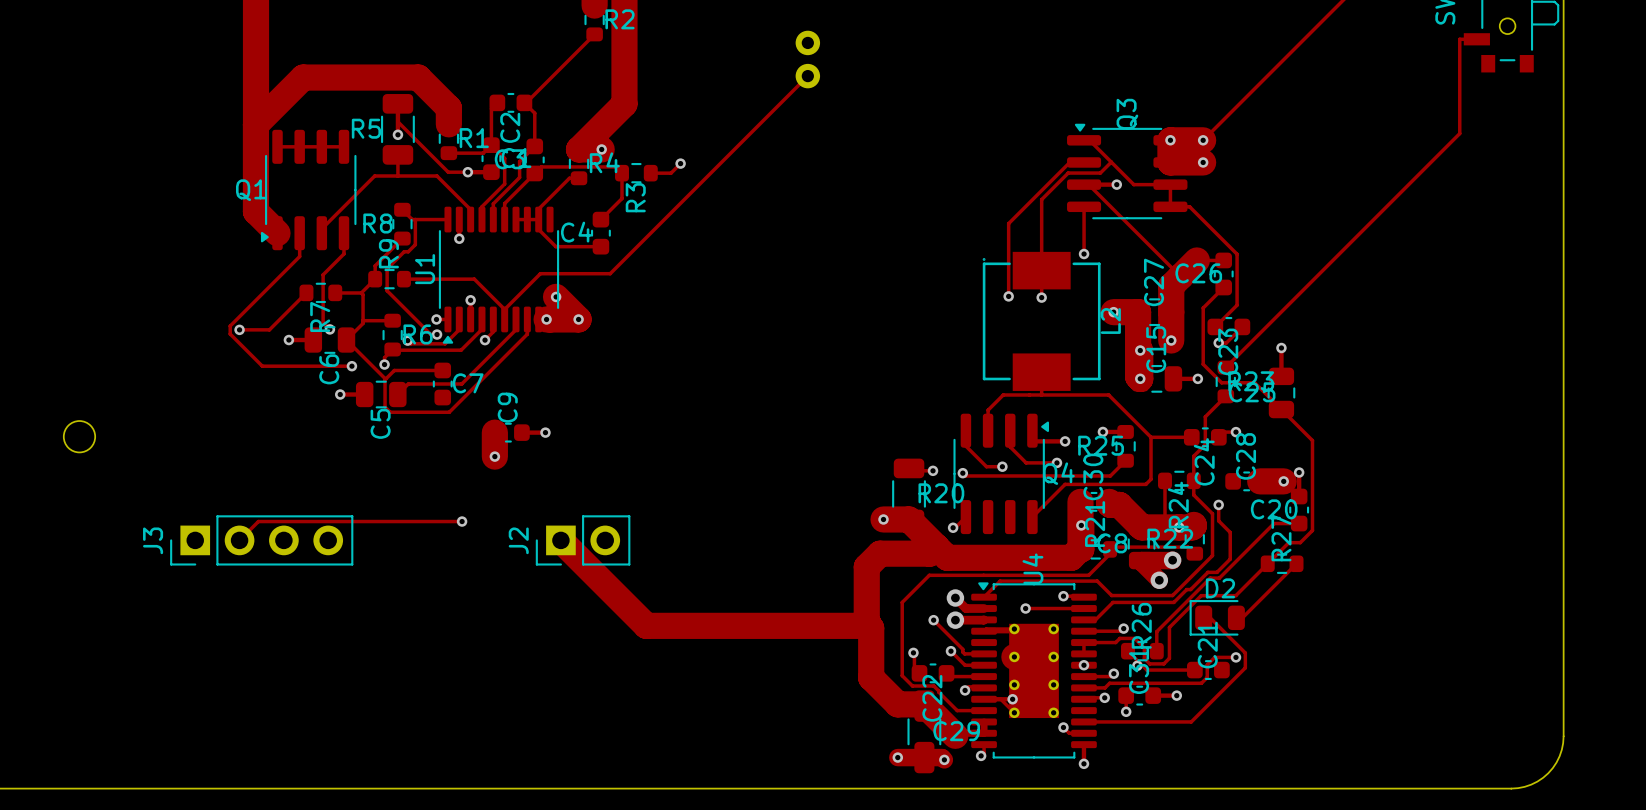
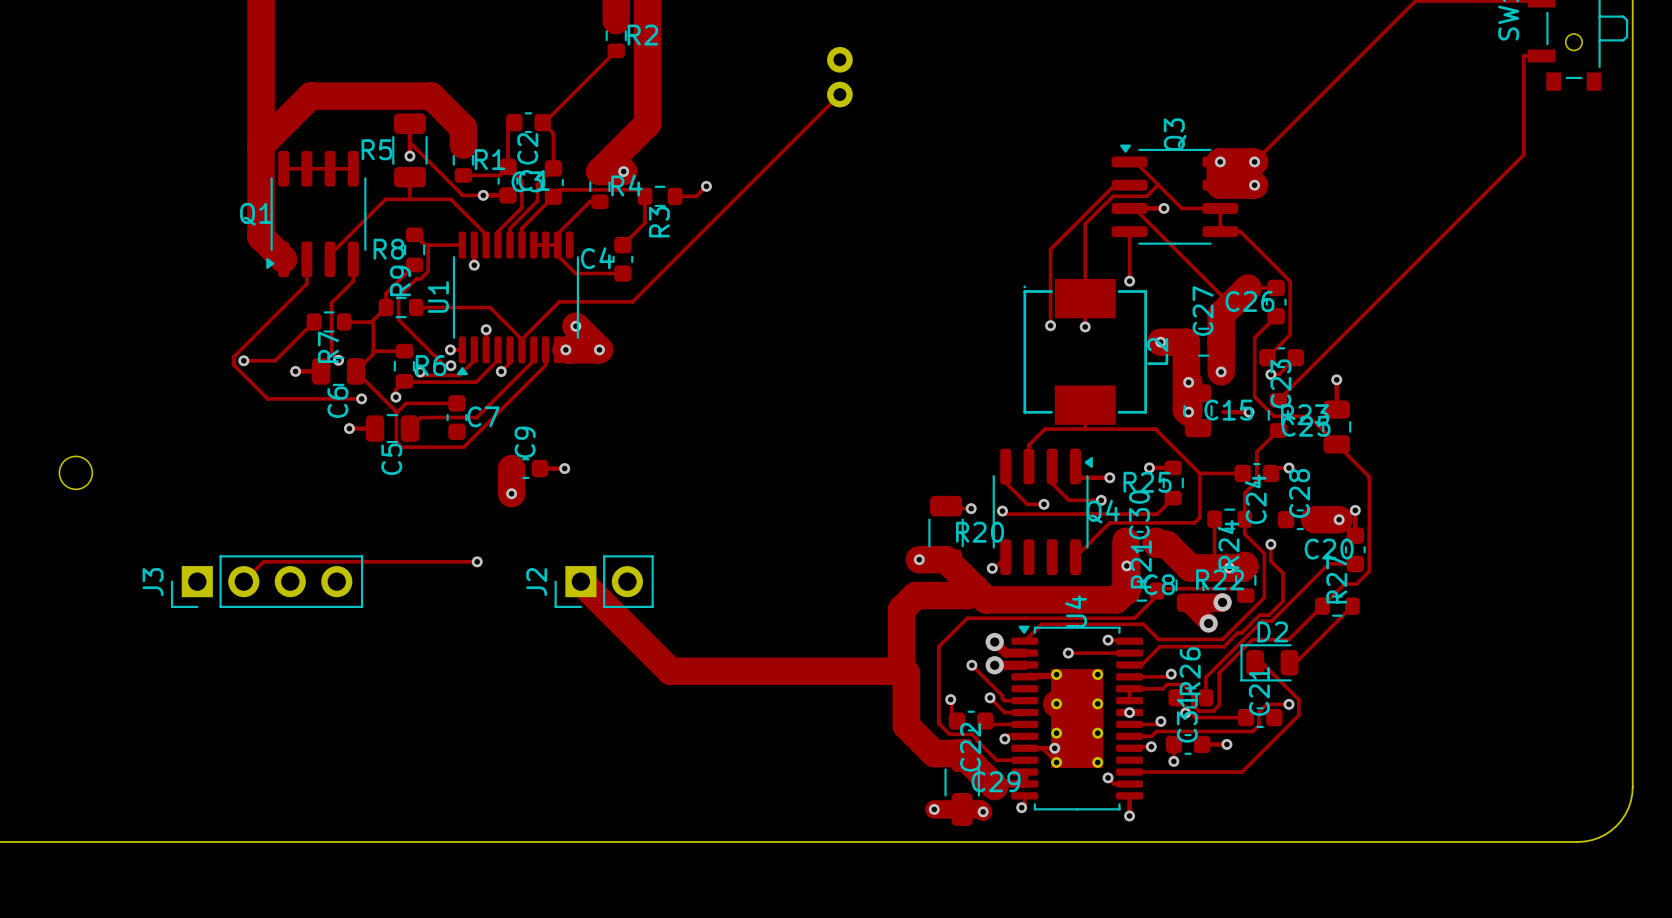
C15 rotation: 0° (1156, 378) -> 90° clockwise (1198, 410)

